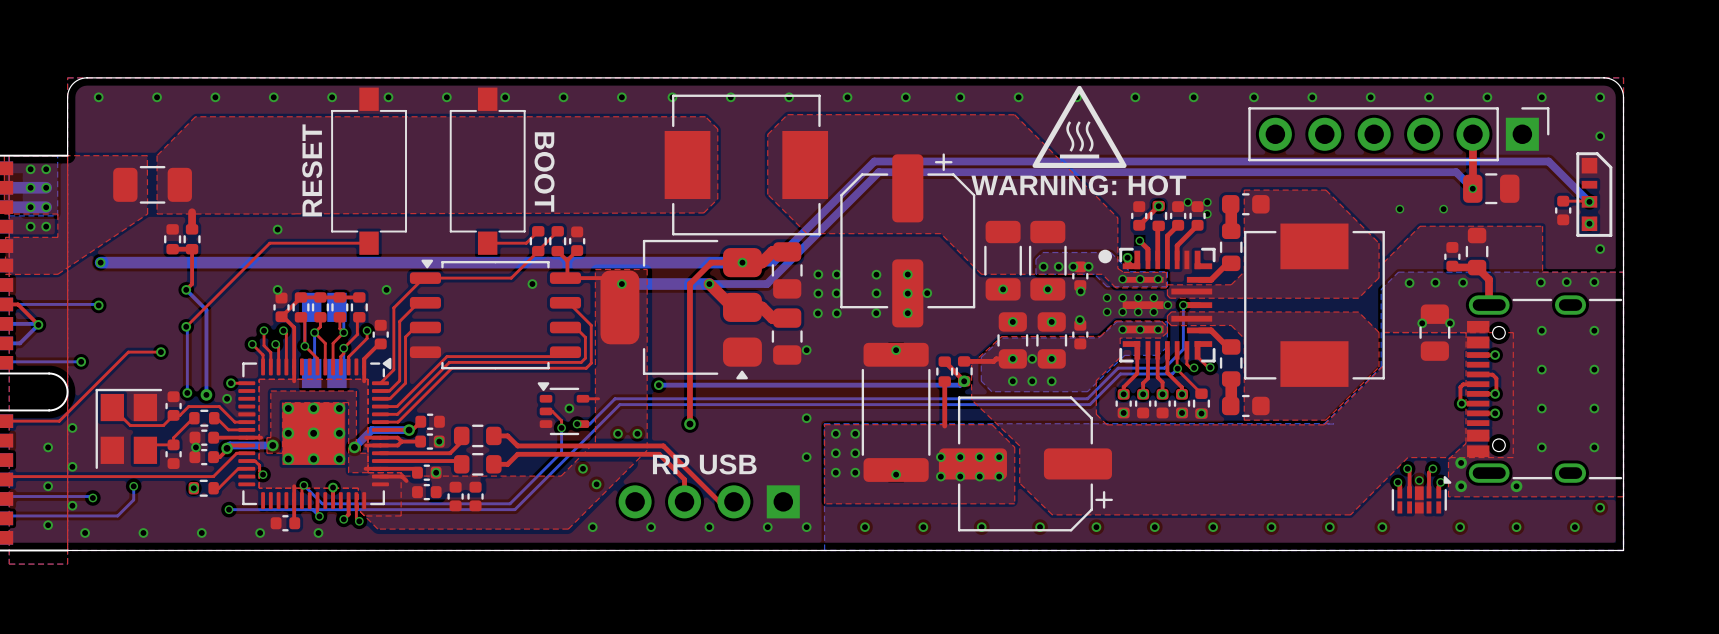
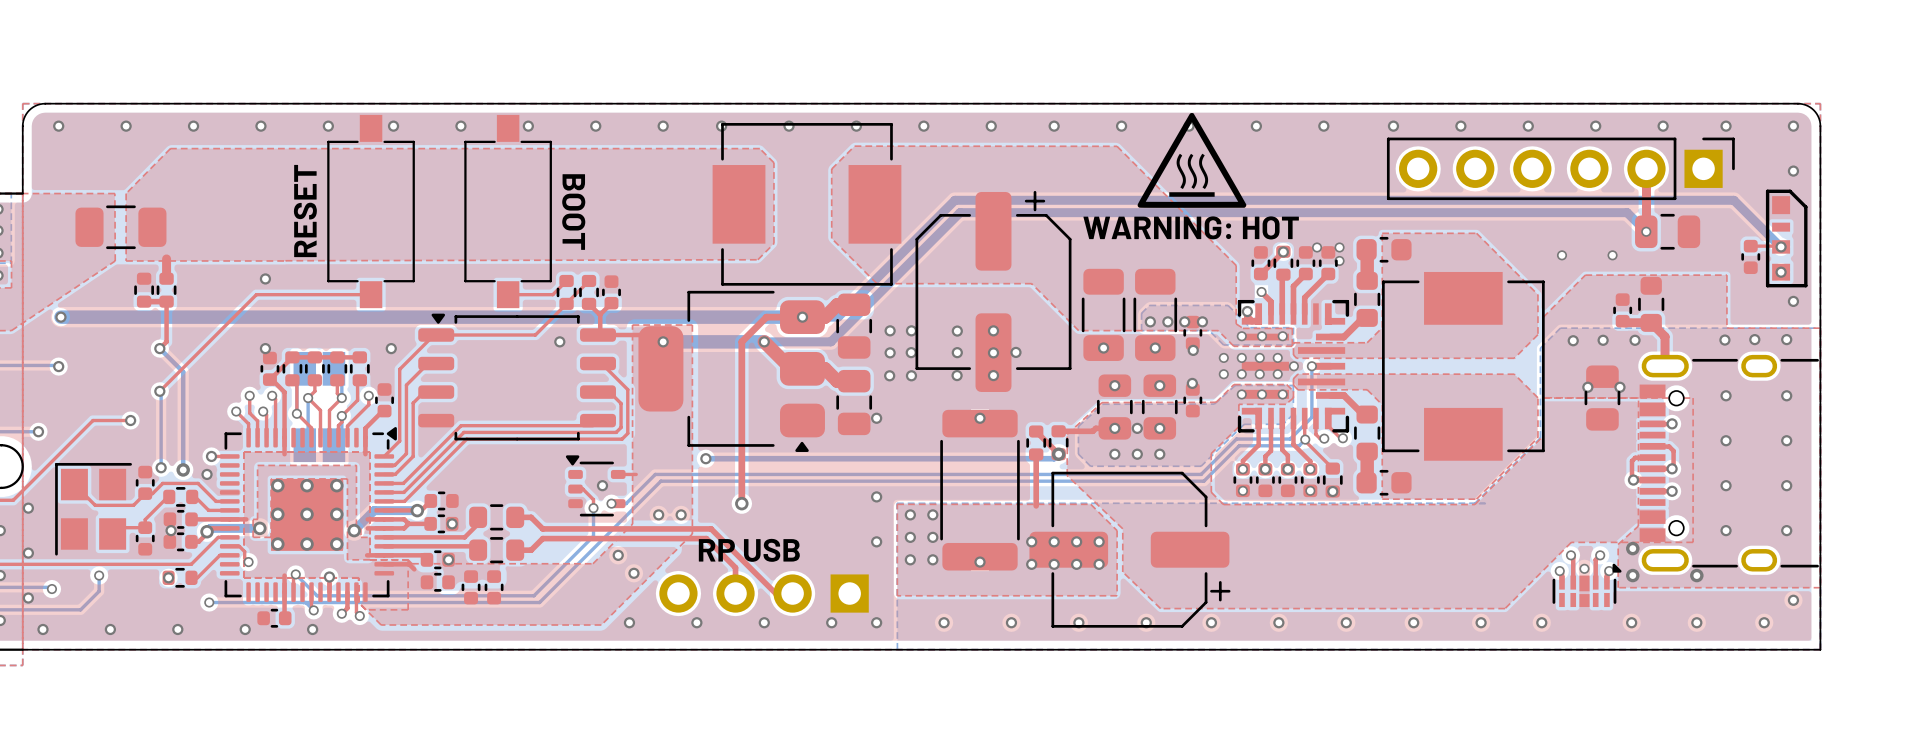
part footprint: [1098, 247, 1216, 363] -> [1237, 299, 1350, 433]

